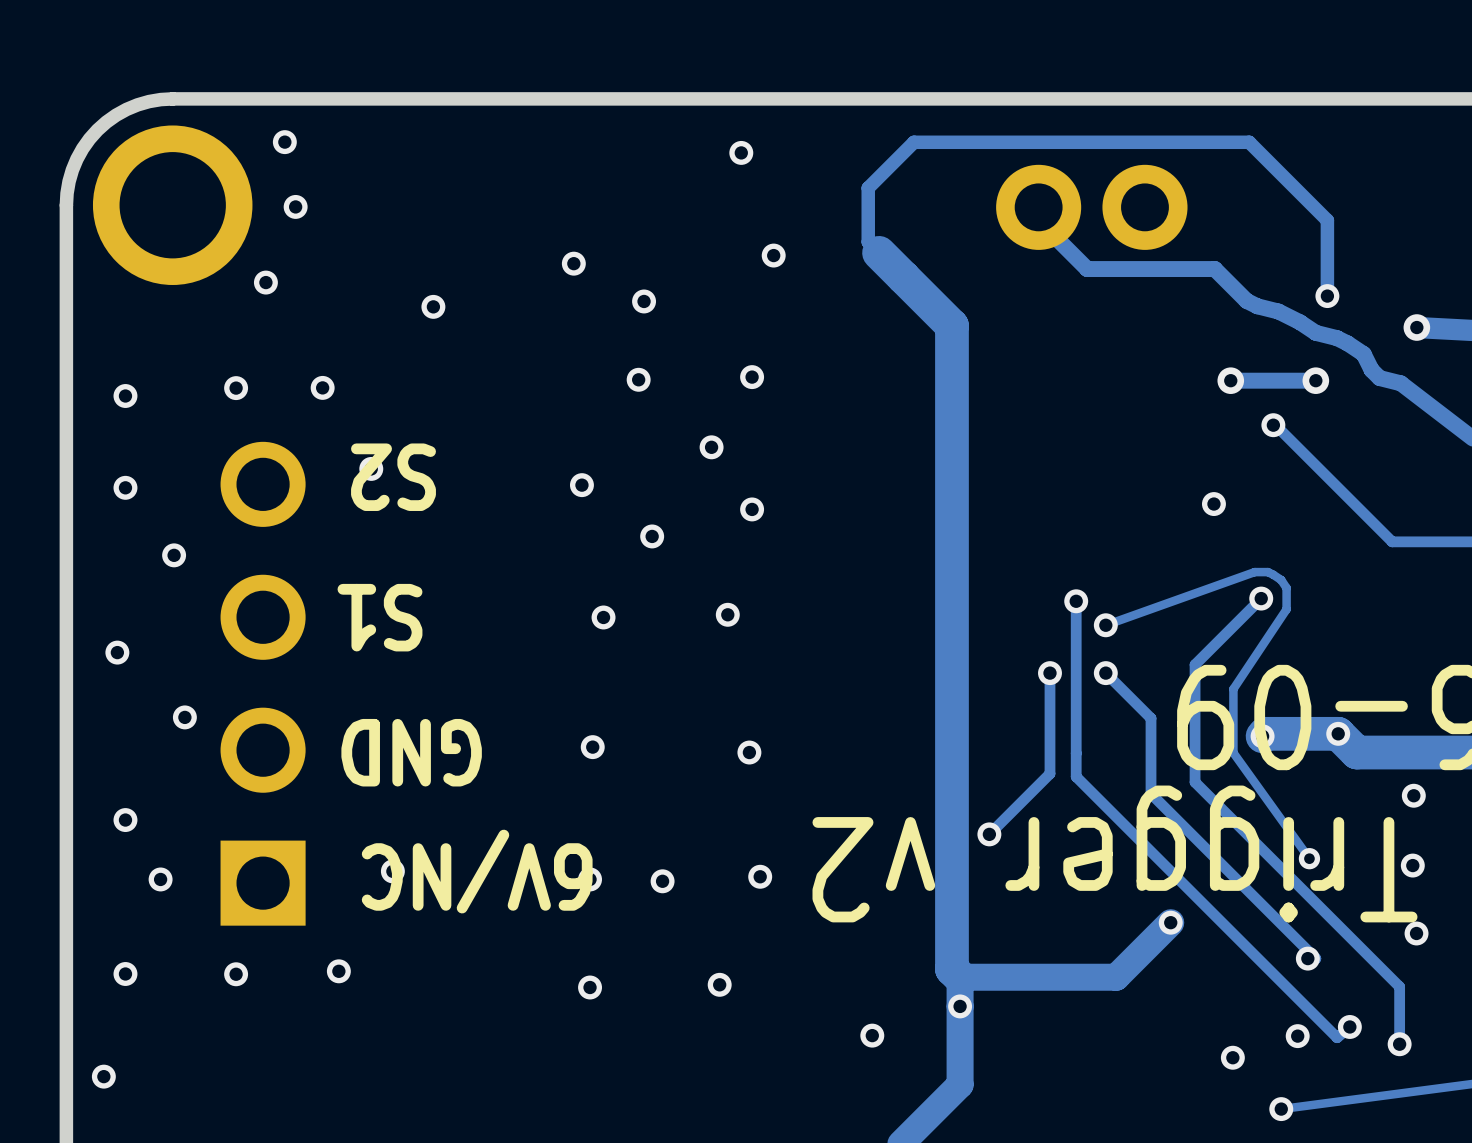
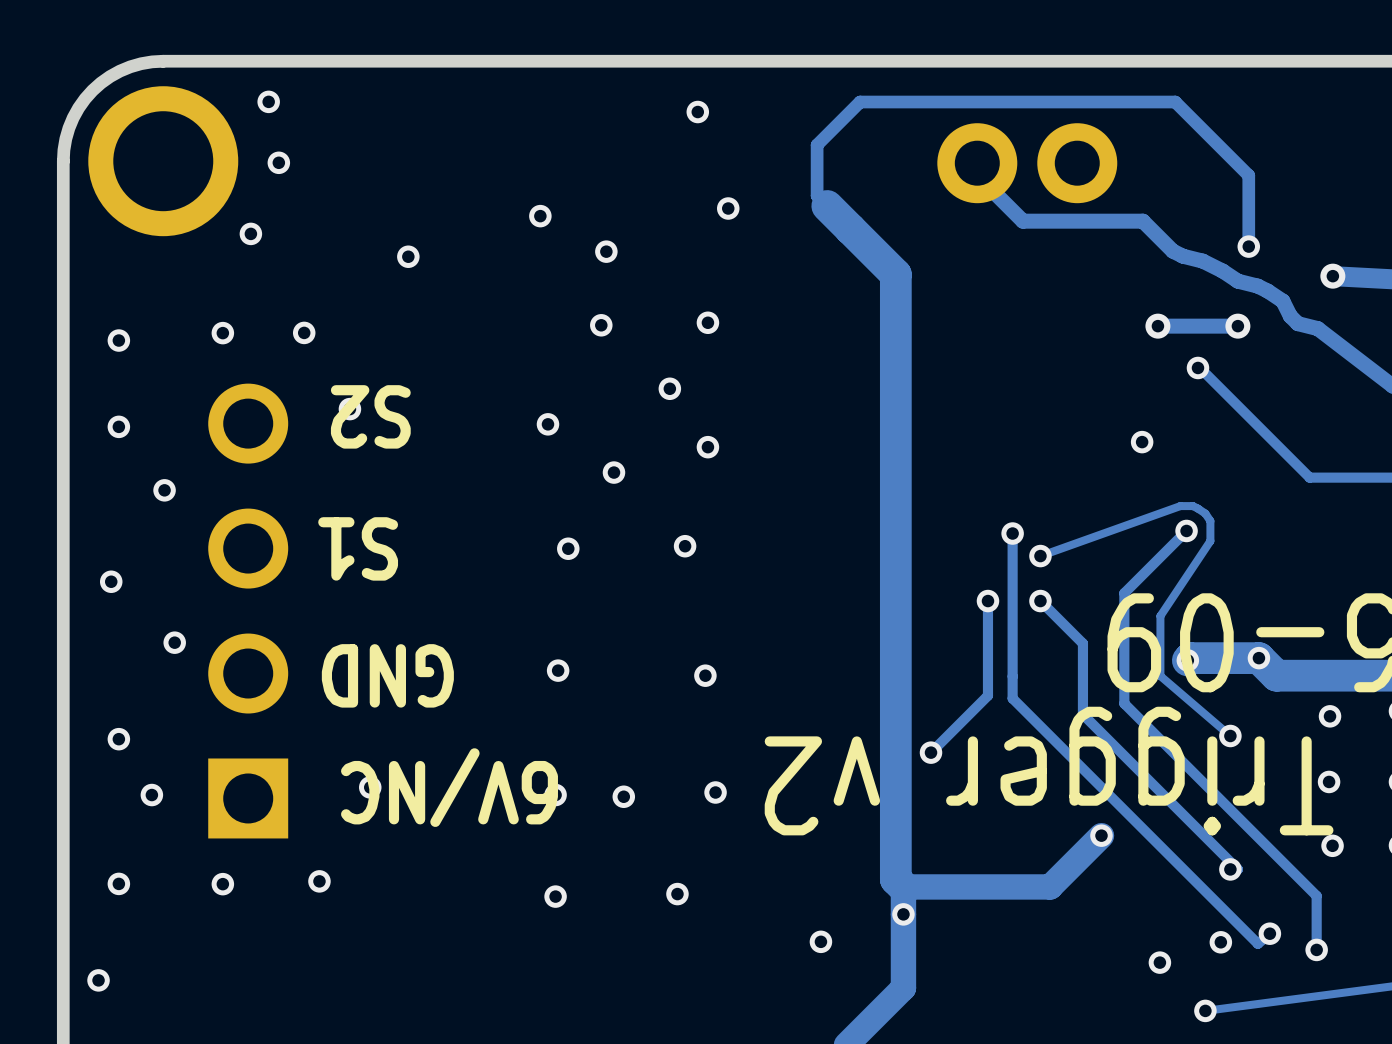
track: (1233, 752) (1309, 858) -> (1160, 676) (1230, 736)
via: none -> (1230, 736)
via: (1309, 858) -> none

